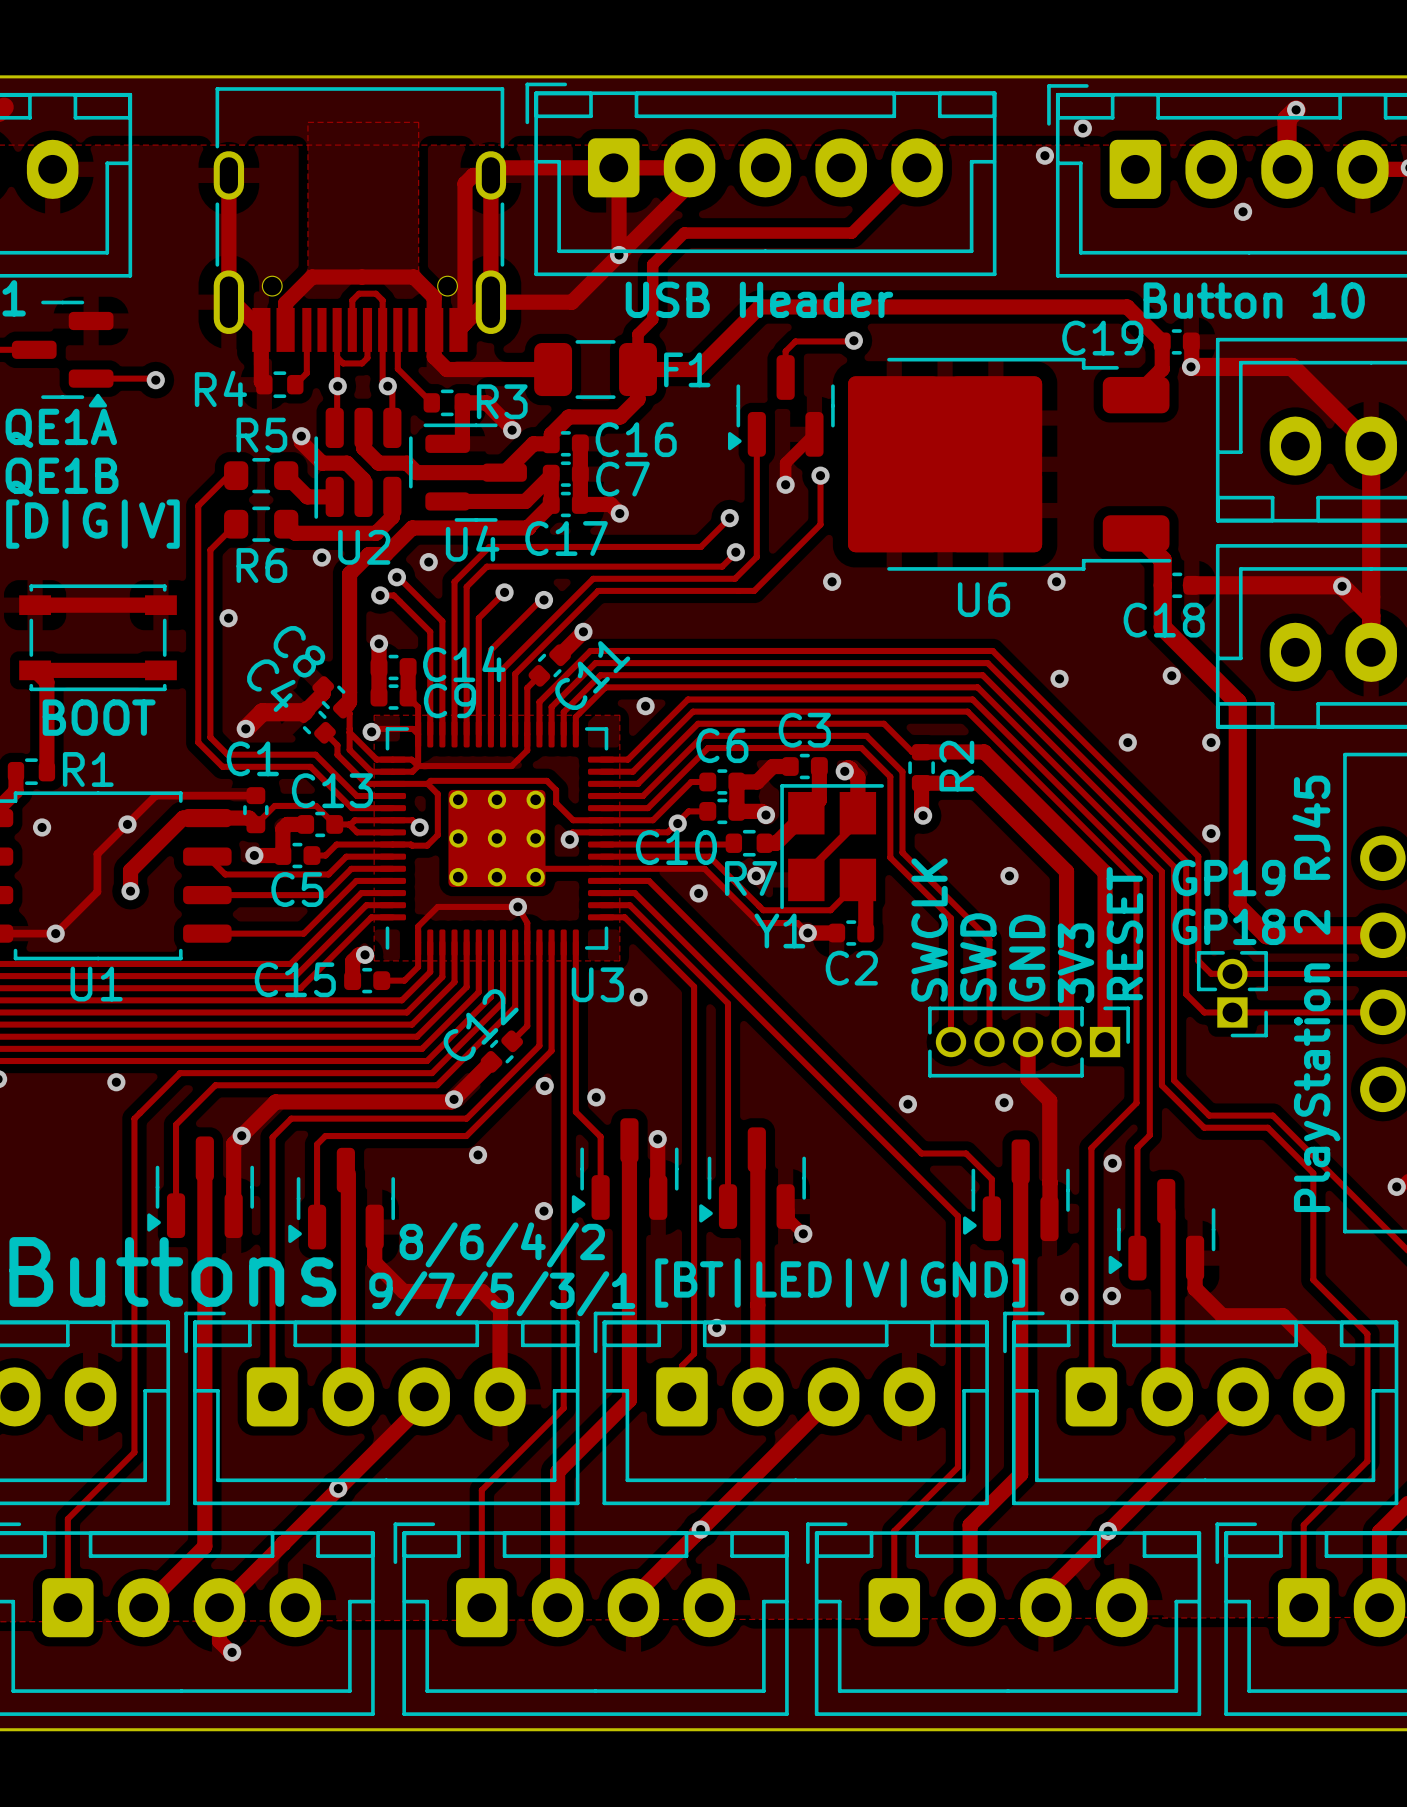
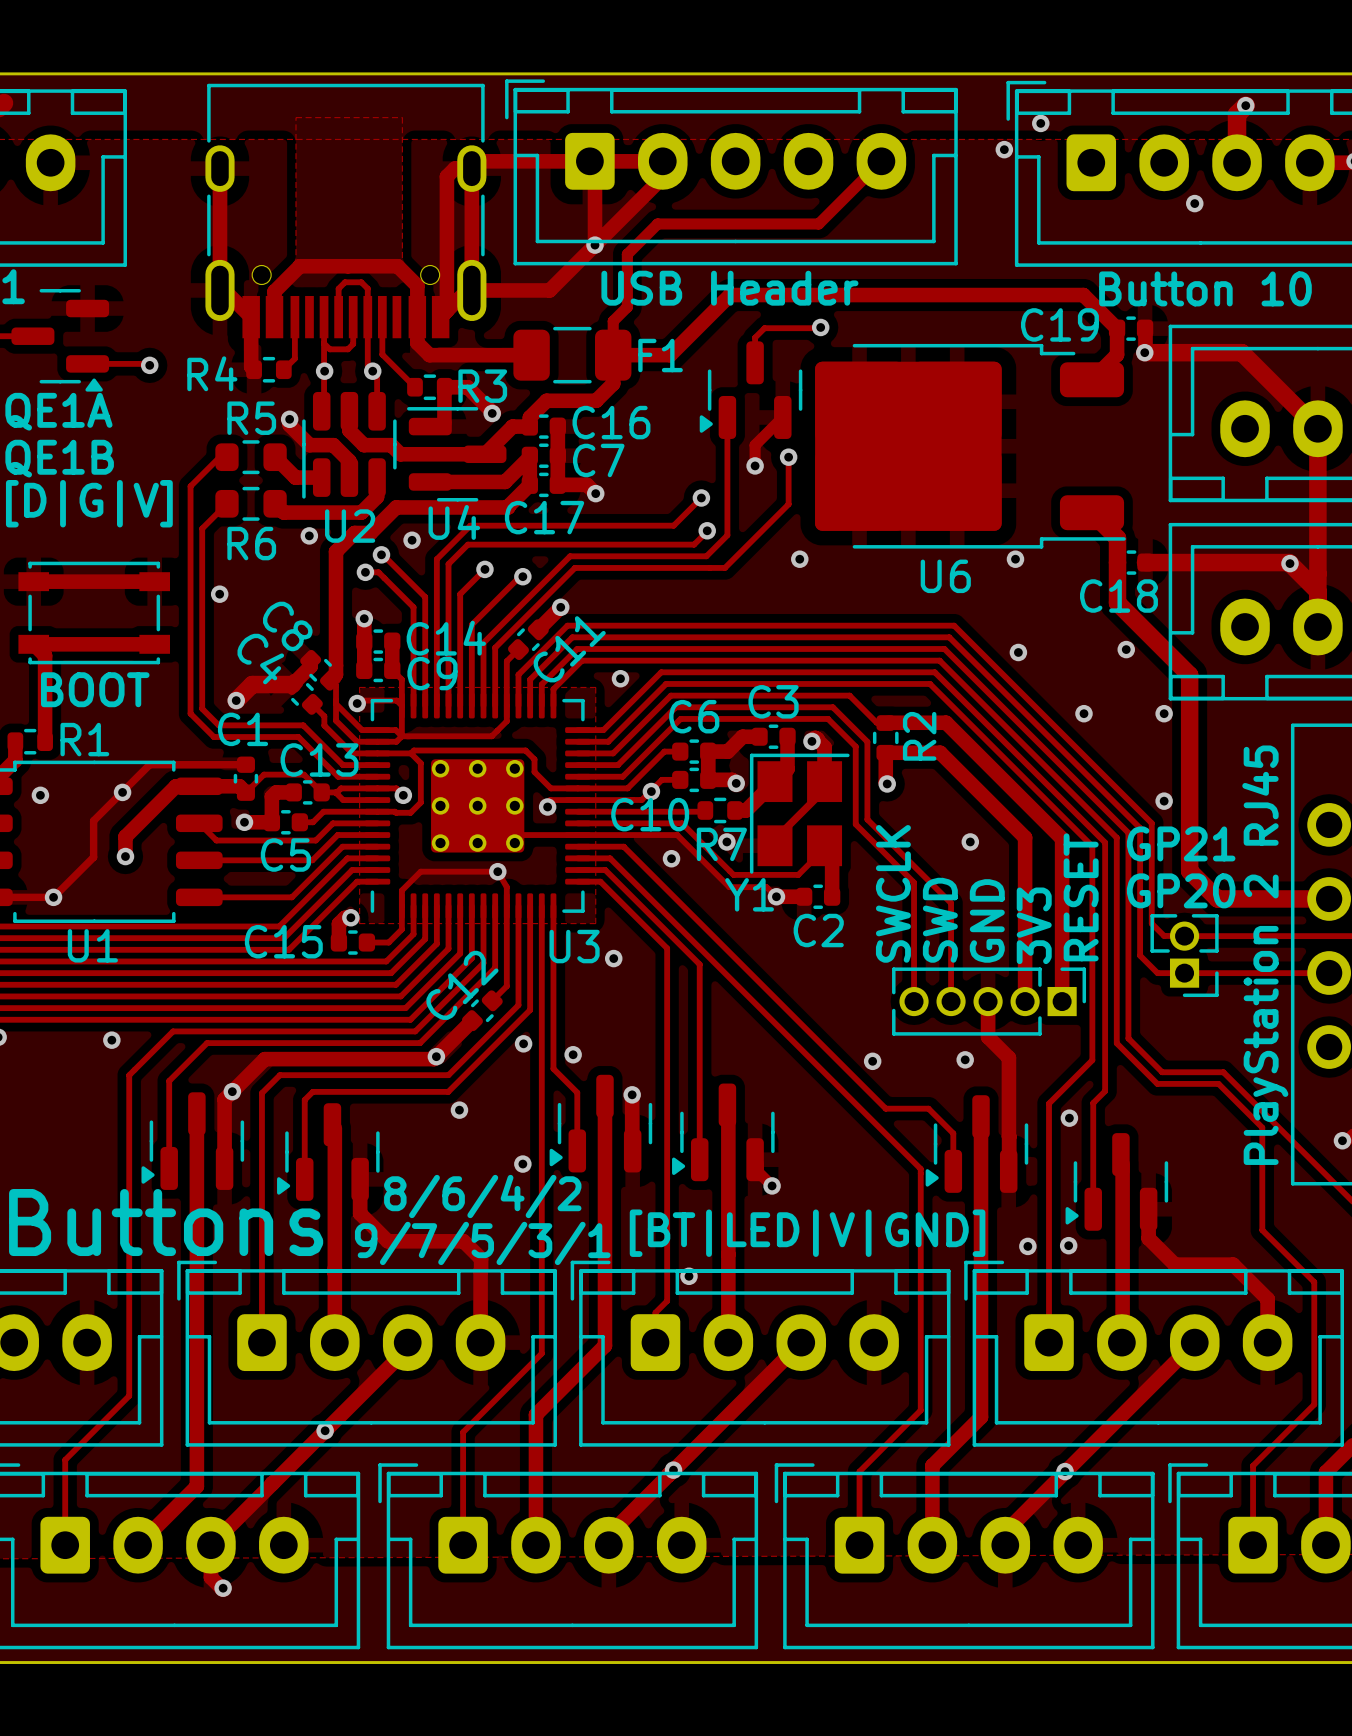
text: GP19 (1228, 878) -> GP21 (1181, 843)
text: GP18 (1228, 926) -> GP20 (1181, 890)

